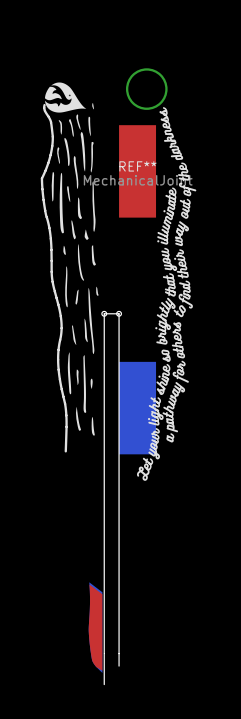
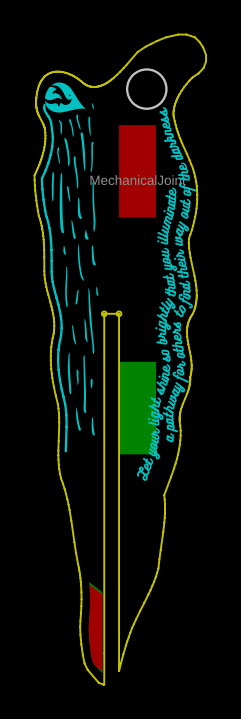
REF** name: REF** (137, 166) -> none
board edge: none -> (119, 666) (119, 671) (130, 632) (152, 585) (158, 568) (164, 518) (164, 495) (178, 454) (180, 435) (180, 413) (188, 388) (191, 370) (187, 328) (194, 308) (196, 294) (188, 238) (195, 212) (197, 190) (194, 172) (178, 134) (173, 113) (175, 101) (181, 90) (203, 68) (206, 61) (205, 54) (199, 41) (194, 37) (186, 34) (166, 37) (145, 46) (137, 52) (113, 77) (102, 85) (89, 86) (70, 74) (54, 71) (42, 78) (36, 94) (36, 108) (44, 127) (45, 138) (42, 156) (34, 175) (34, 185) (43, 236) (44, 279) (54, 321) (50, 360) (58, 413) (59, 469) (68, 504) (79, 574) (80, 635) (84, 663) (98, 682) (104, 684)

